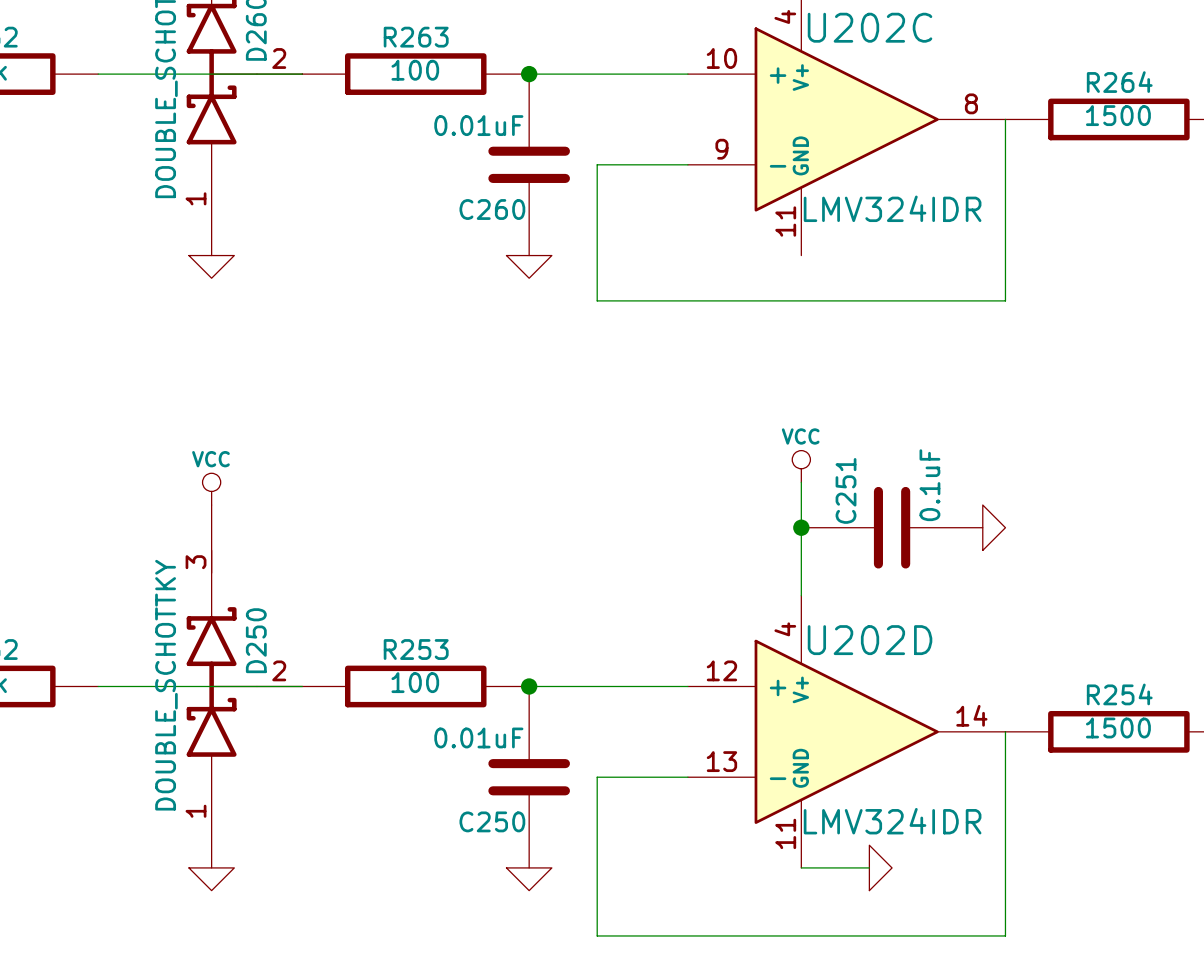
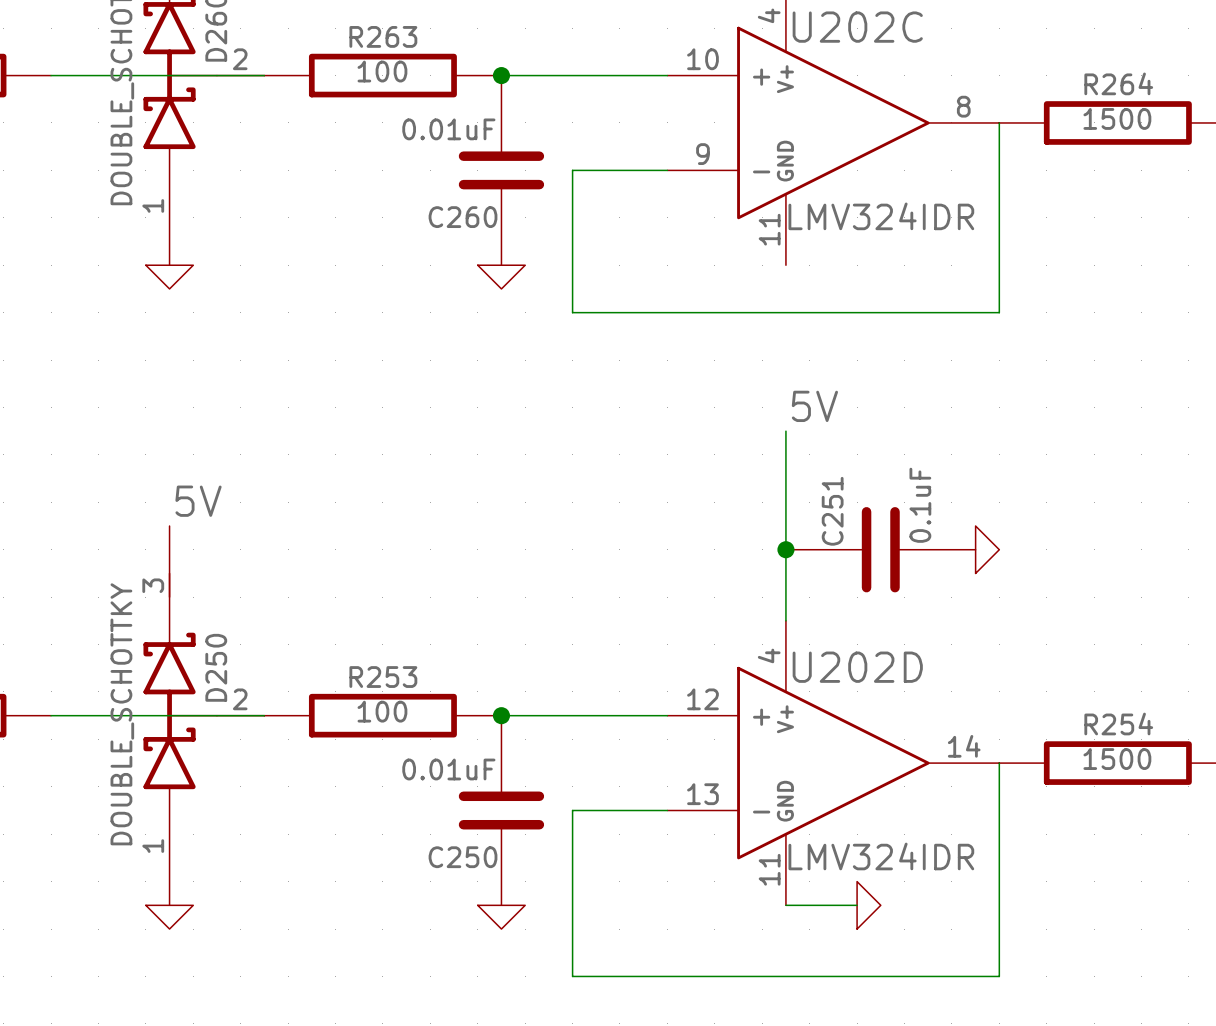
label: none -> 5V (814, 406)
wire: none -> (785, 431) (785, 502)
power symbol: VCC (801, 466) -> none
label: none -> 5V (198, 501)
power symbol: VCC (211, 489) -> none

